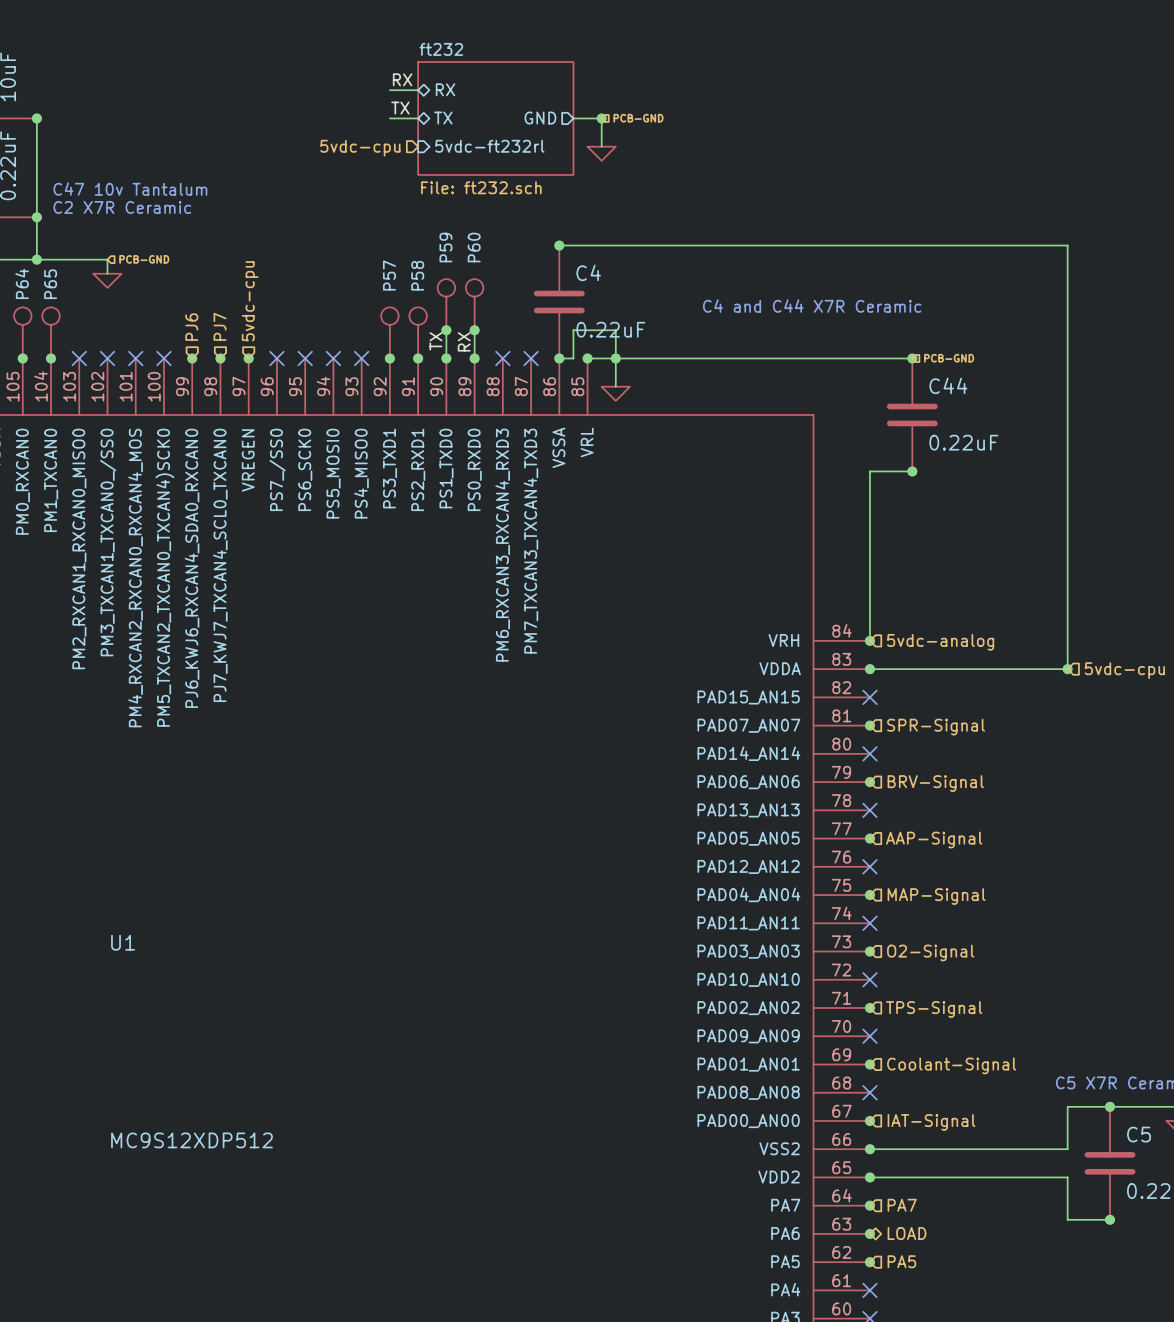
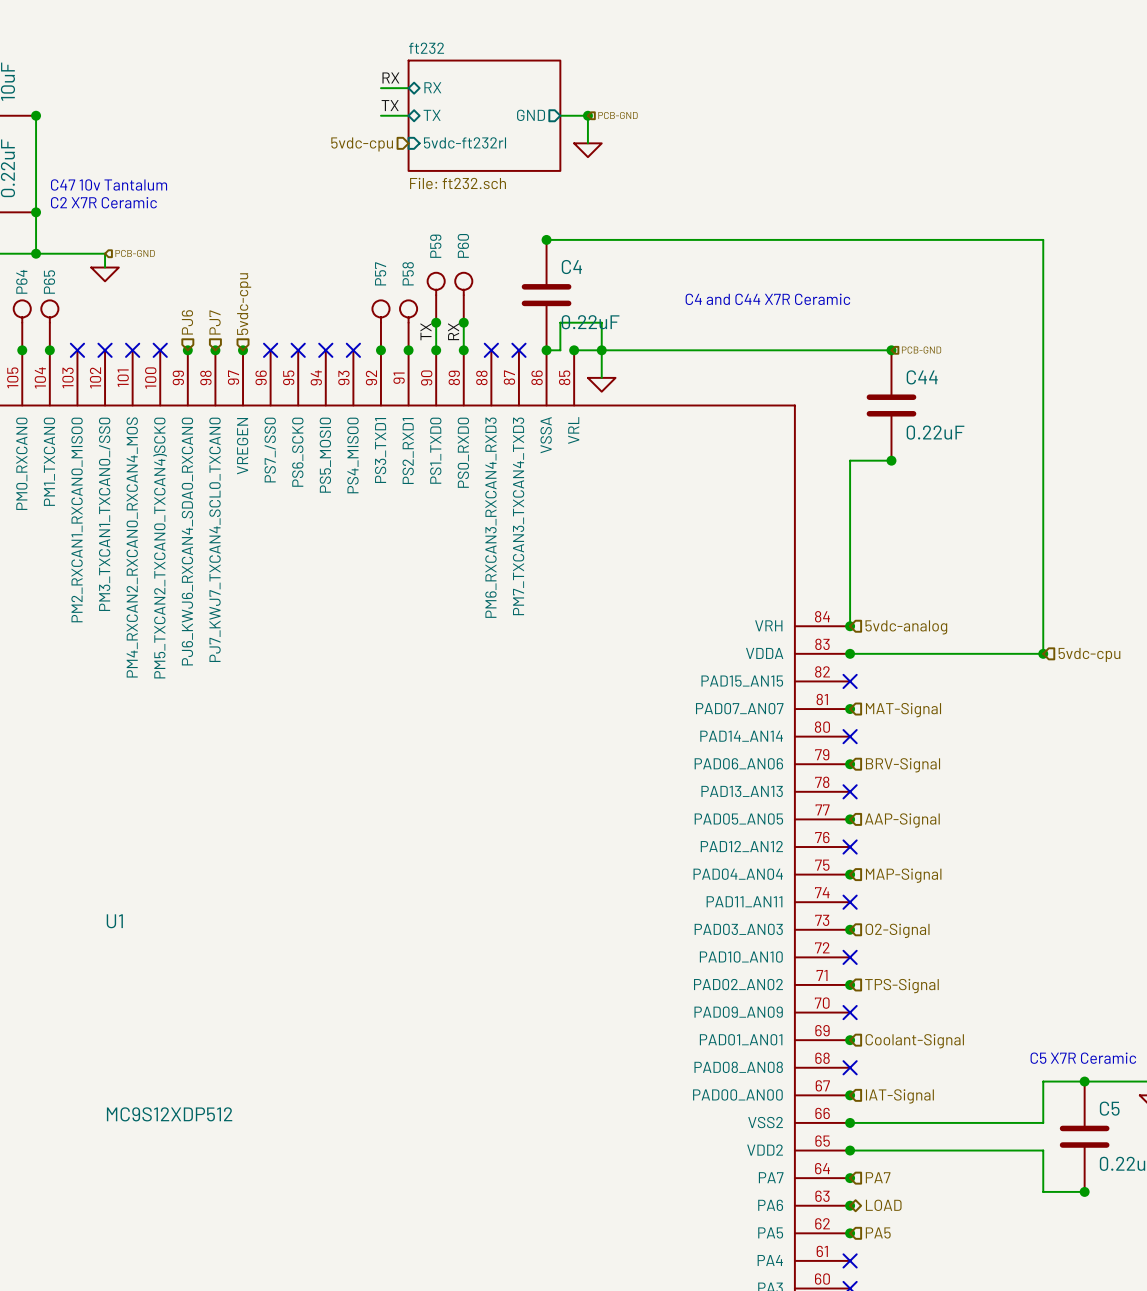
hierarchical label: SPR-Signal (936, 727) -> MAT-Signal (903, 710)

